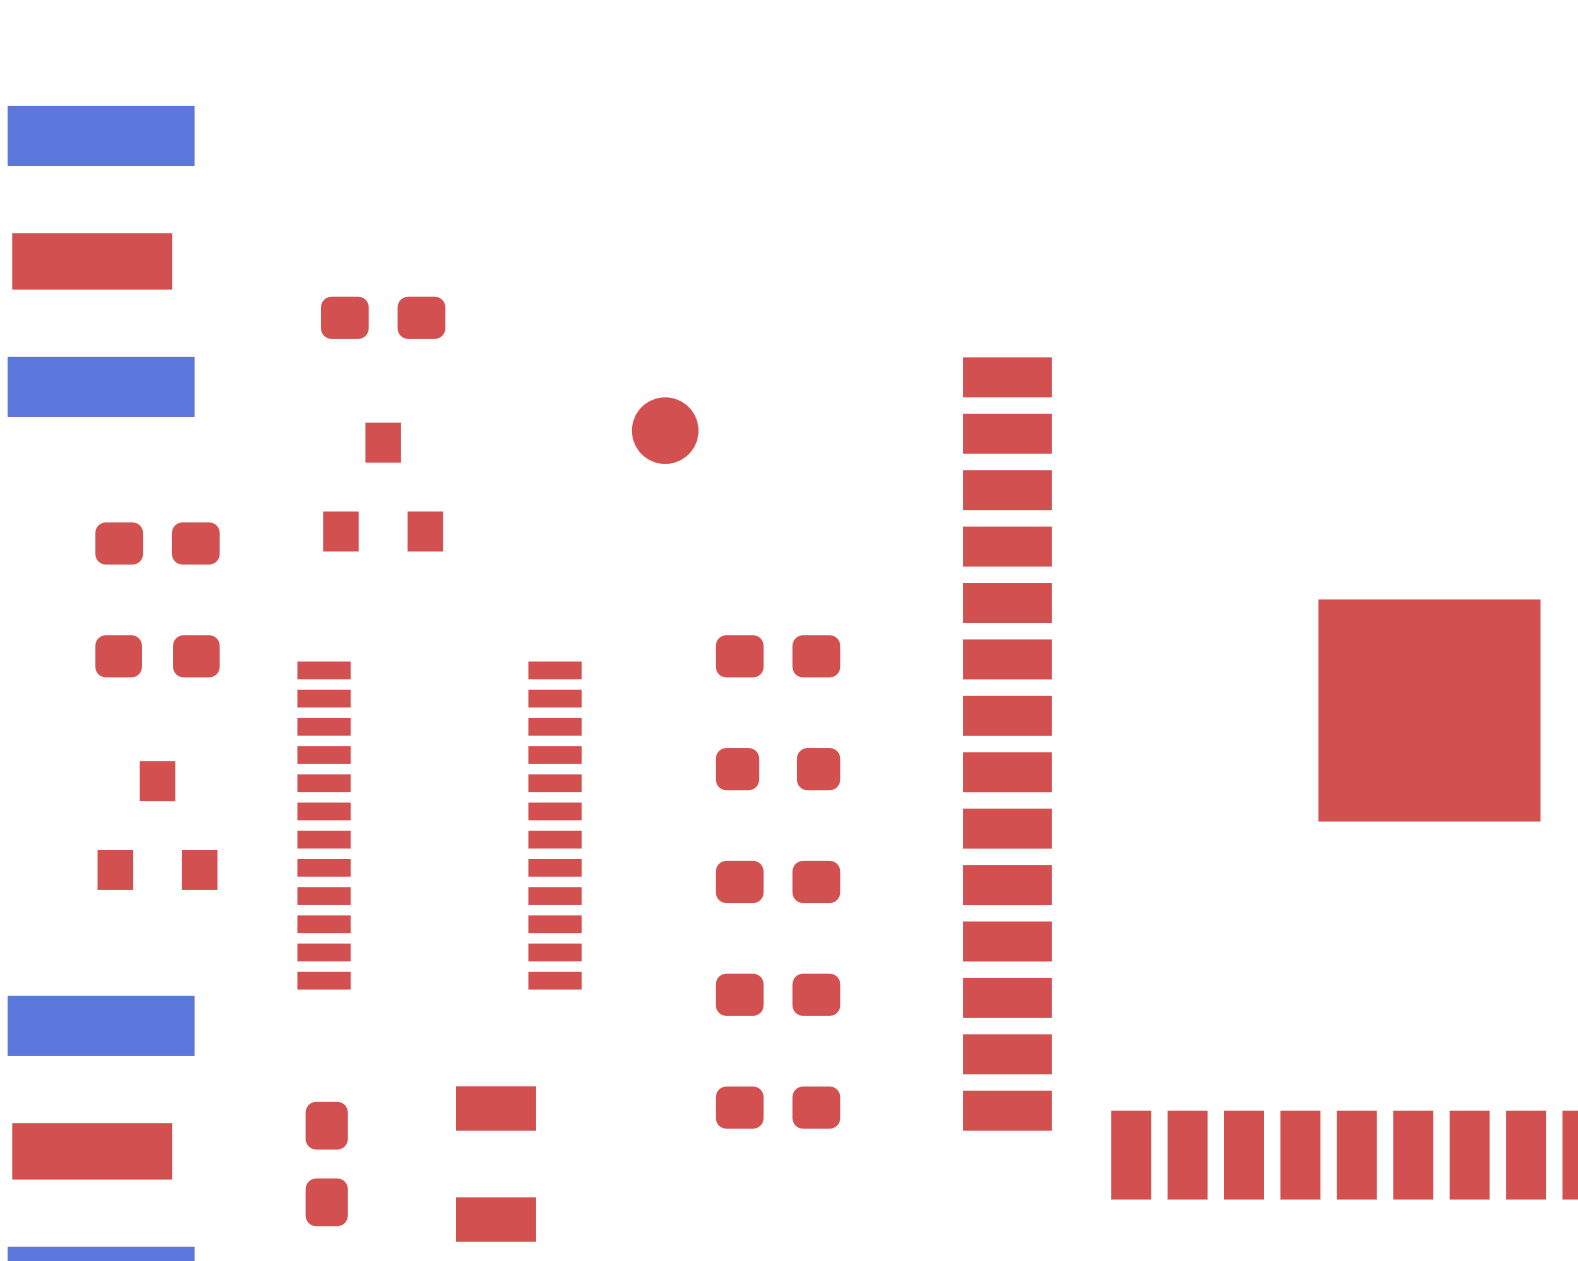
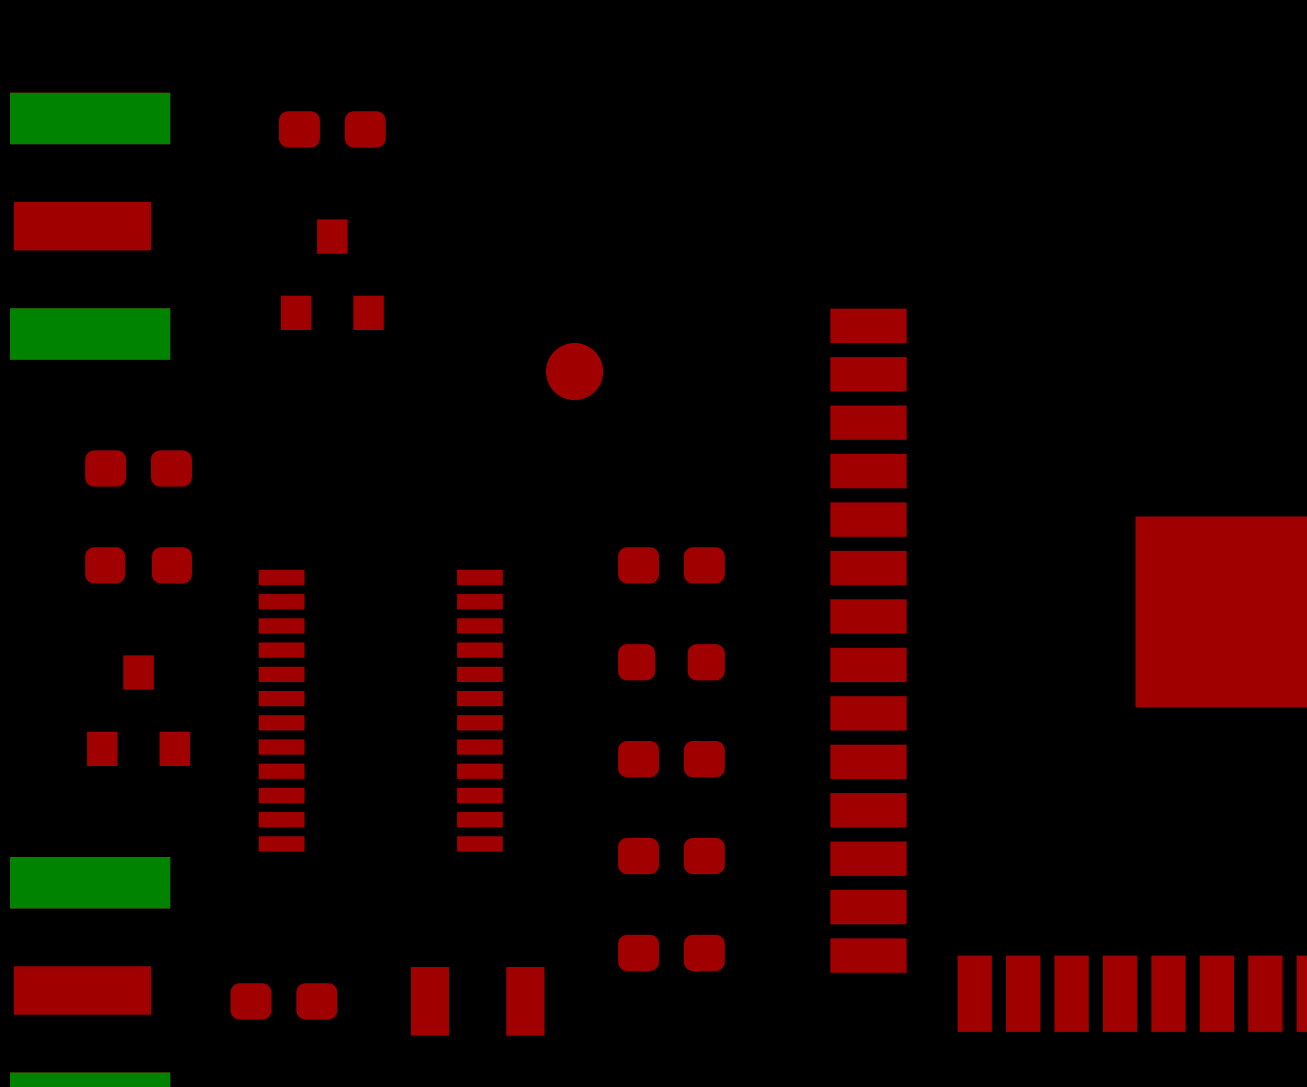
part: none -> (332, 129)
part footprint: [320, 296, 446, 339] -> [280, 219, 384, 331]
part: (383, 487) -> none
part rotation: 0° (326, 1164) -> 90° clockwise (283, 1001)
part rotation: 0° (495, 1164) -> 90° clockwise (477, 1001)

